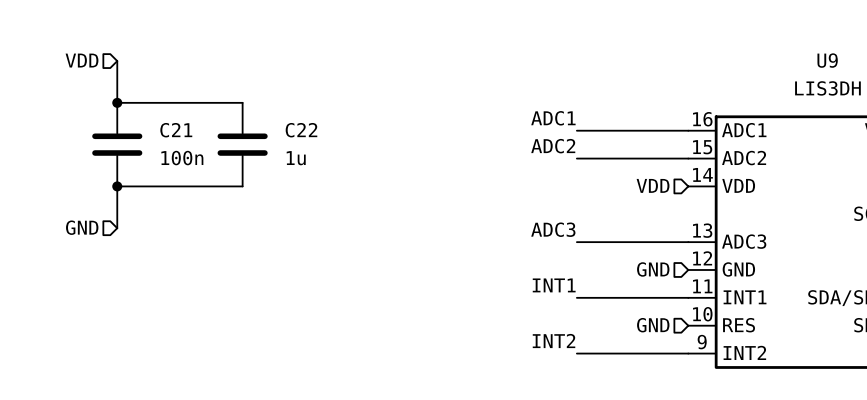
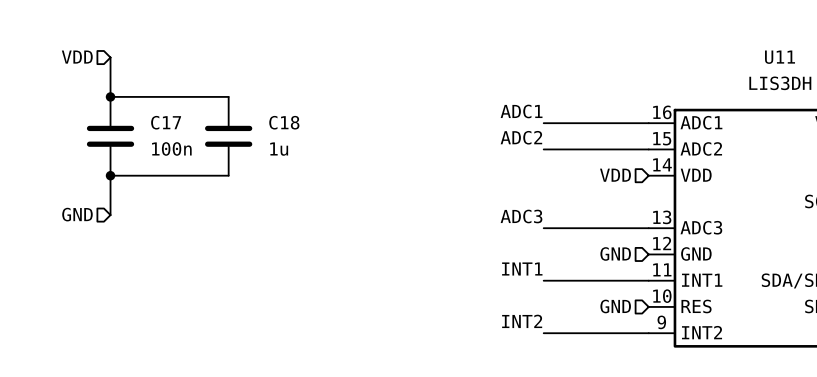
U9 name: U9 (827, 60) -> U11 (780, 57)
C21 name: C21 (176, 130) -> C17 (166, 122)
C22 name: C22 (301, 130) -> C18 (284, 122)

